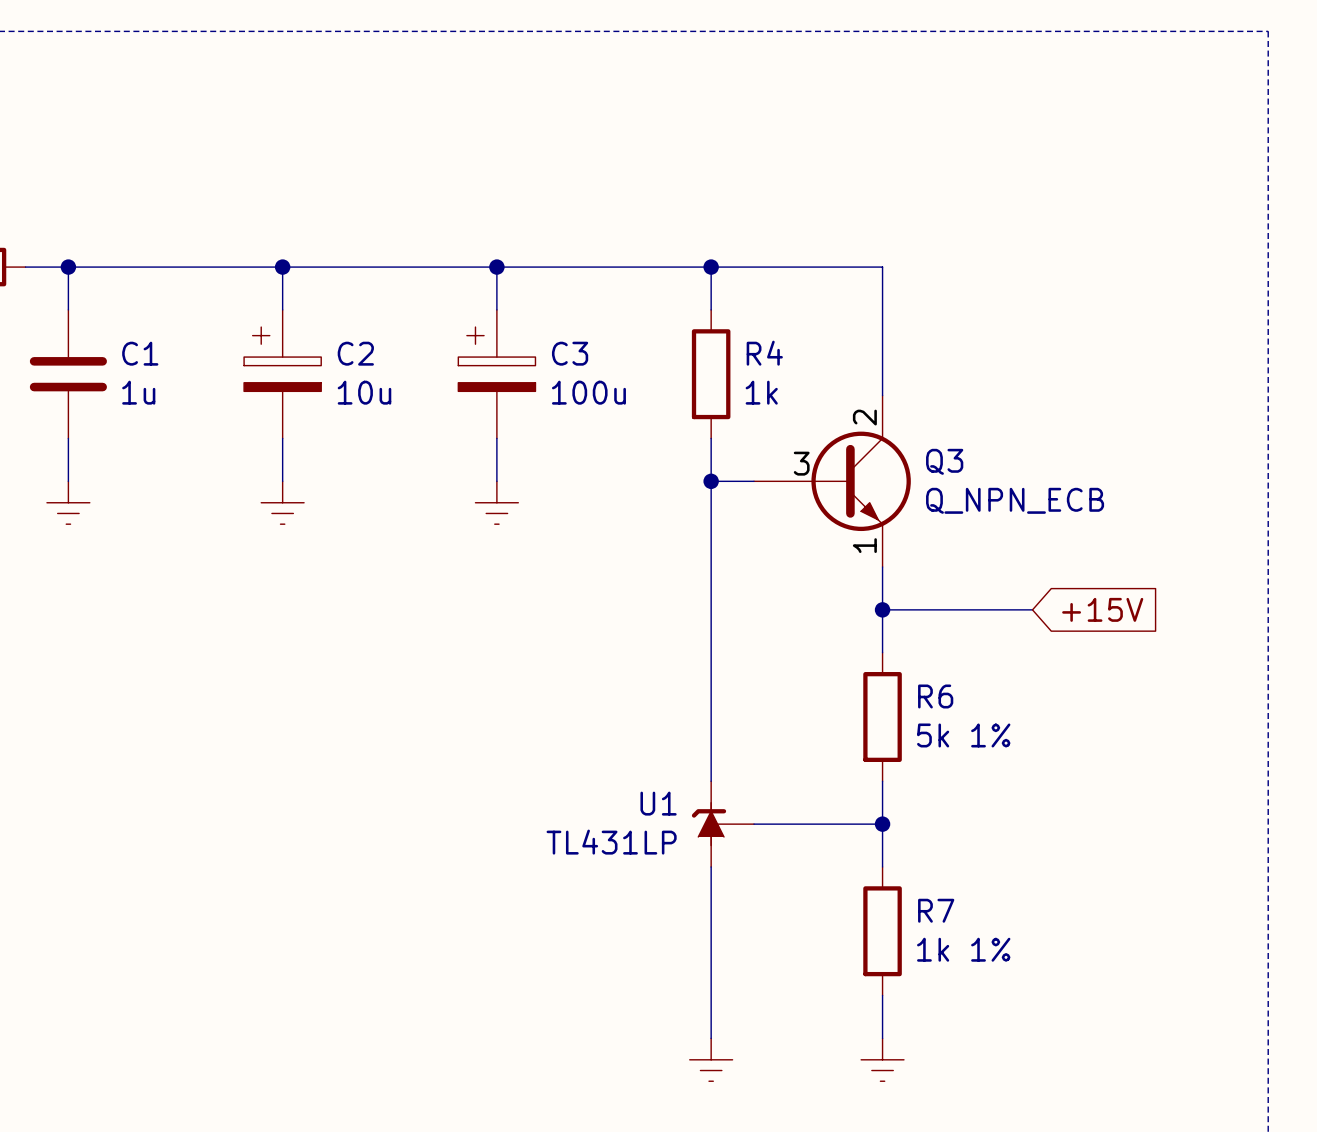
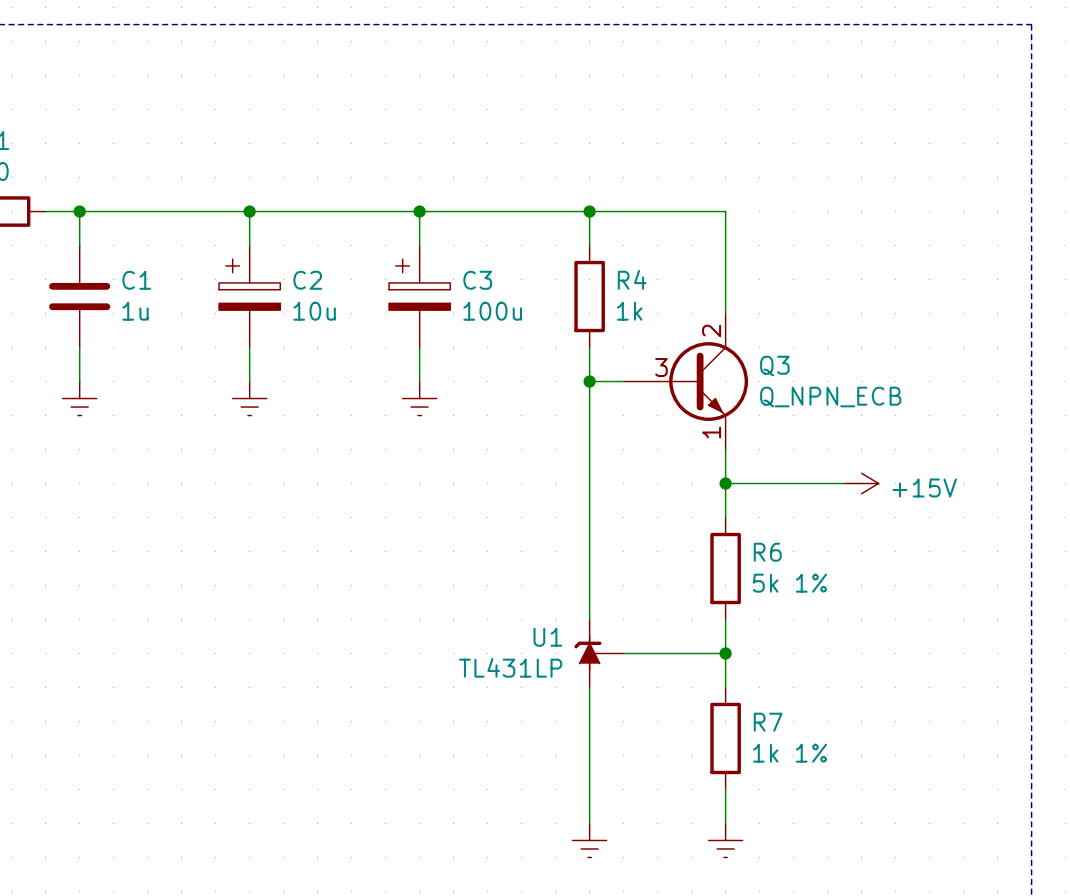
power symbol: none -> +15V (861, 483)
global label: +15V (1102, 609) -> none

